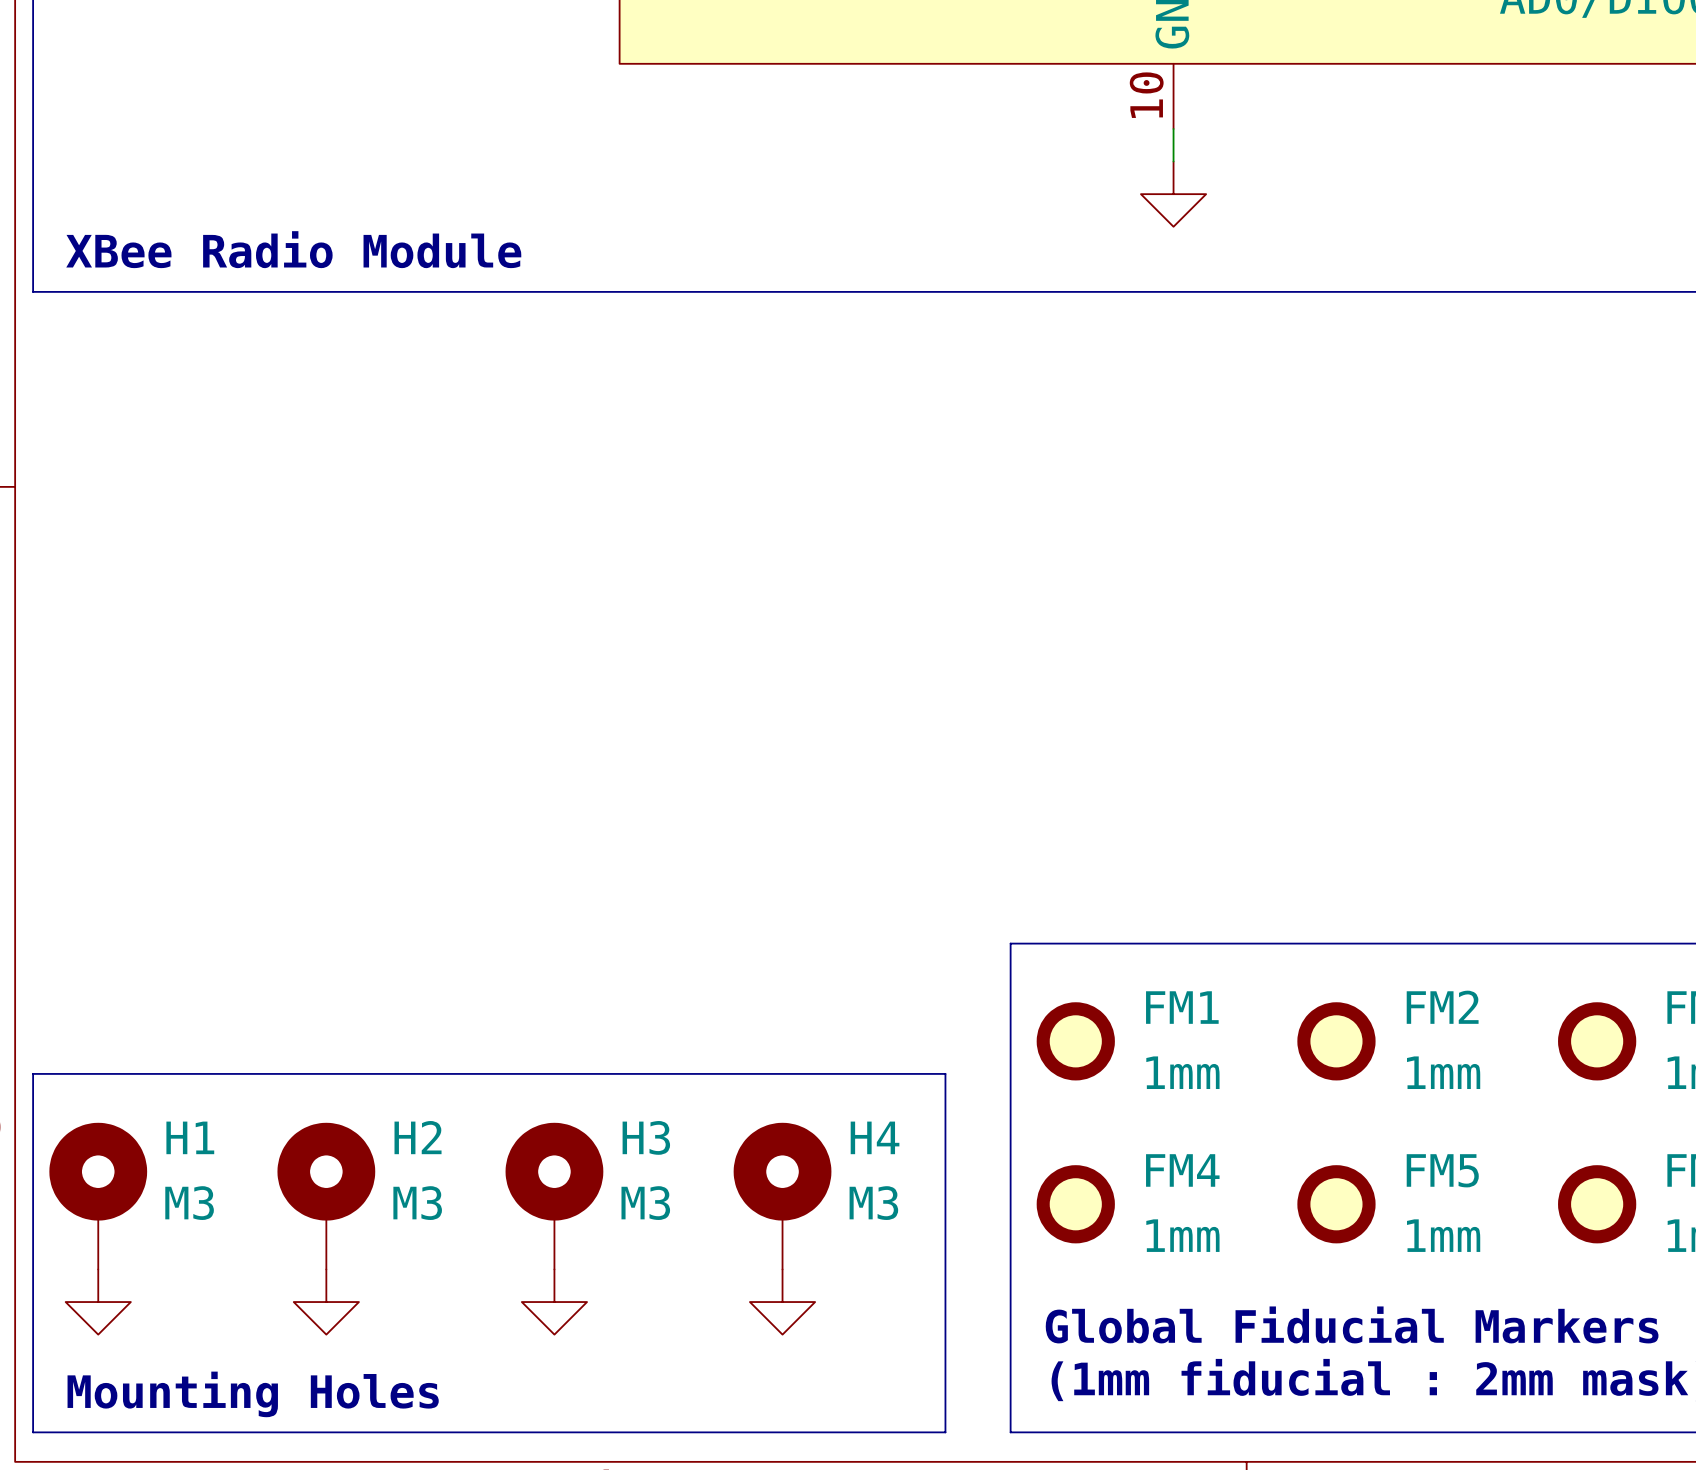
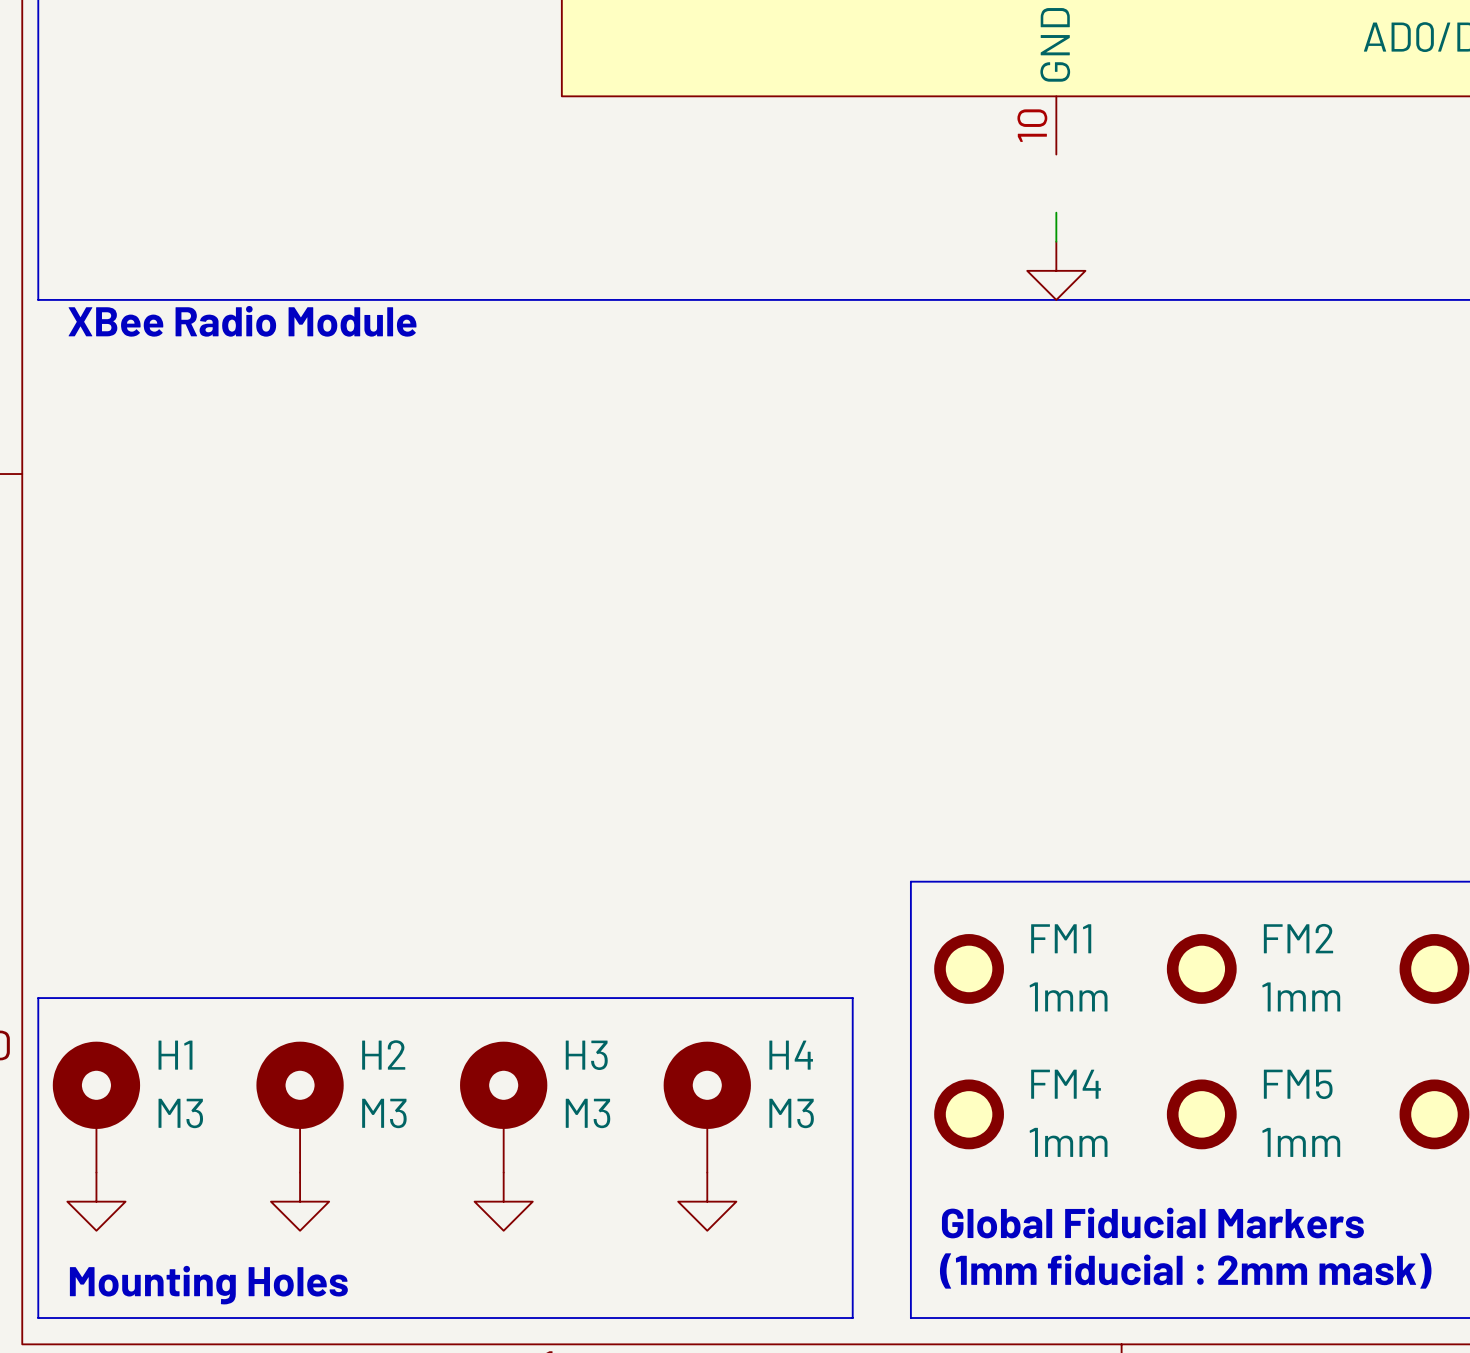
wire: (1173, 128) (1173, 161) -> (1056, 212) (1056, 241)
power symbol position: (1173, 194) -> (1056, 270)
text position: XBee Radio Module (293, 249) -> XBee Radio Module (242, 321)

